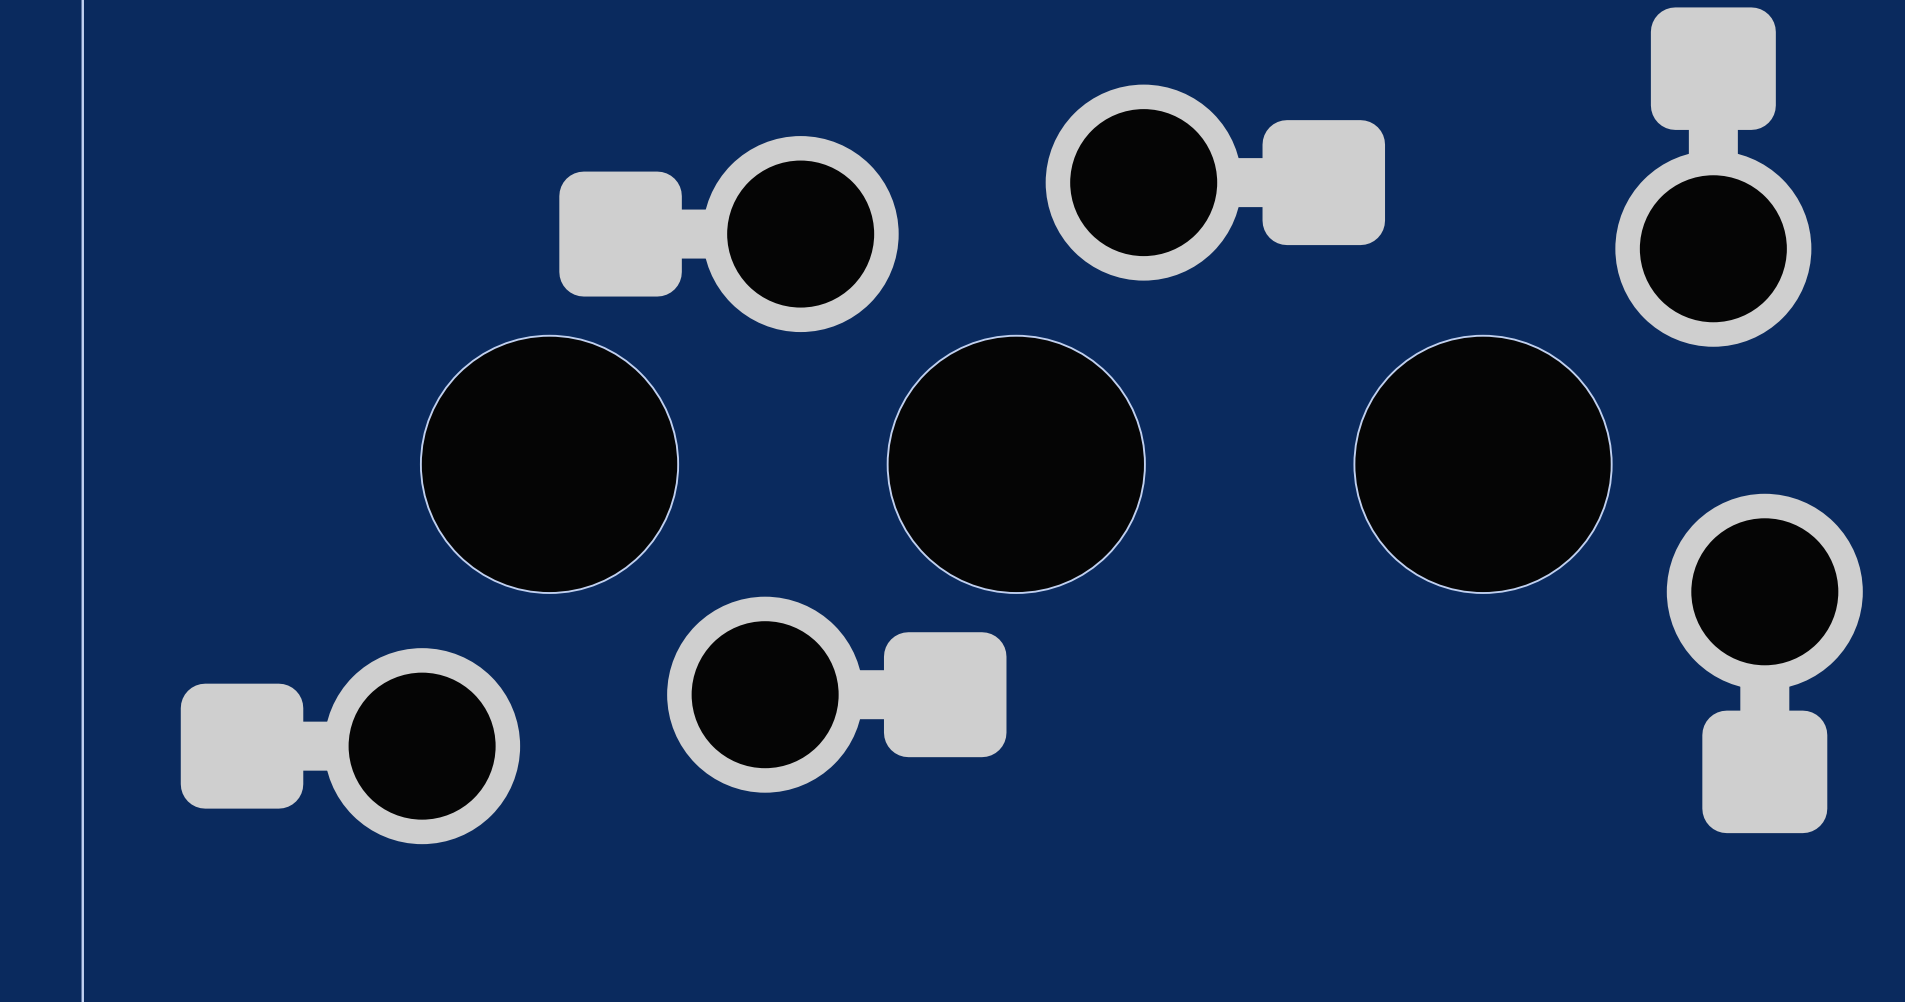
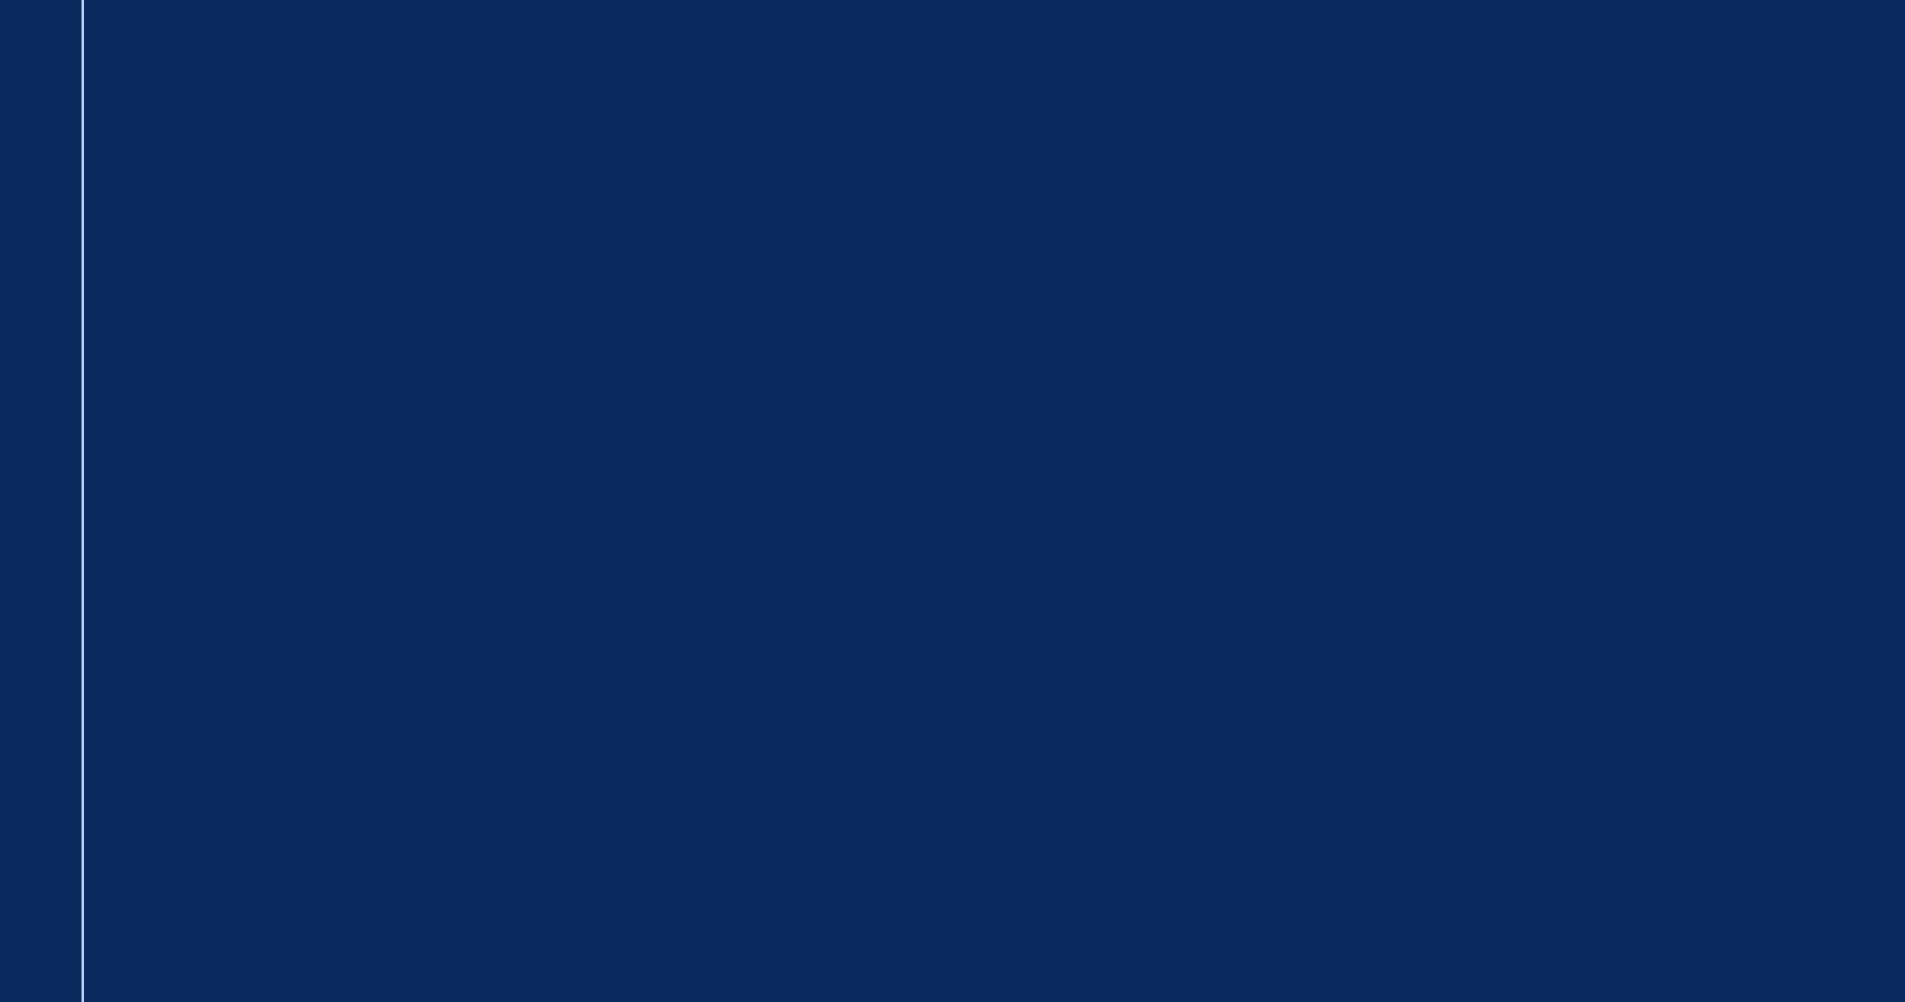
part: (972, 338) -> none
part: (1608, 420) -> none
part: (593, 589) -> none

